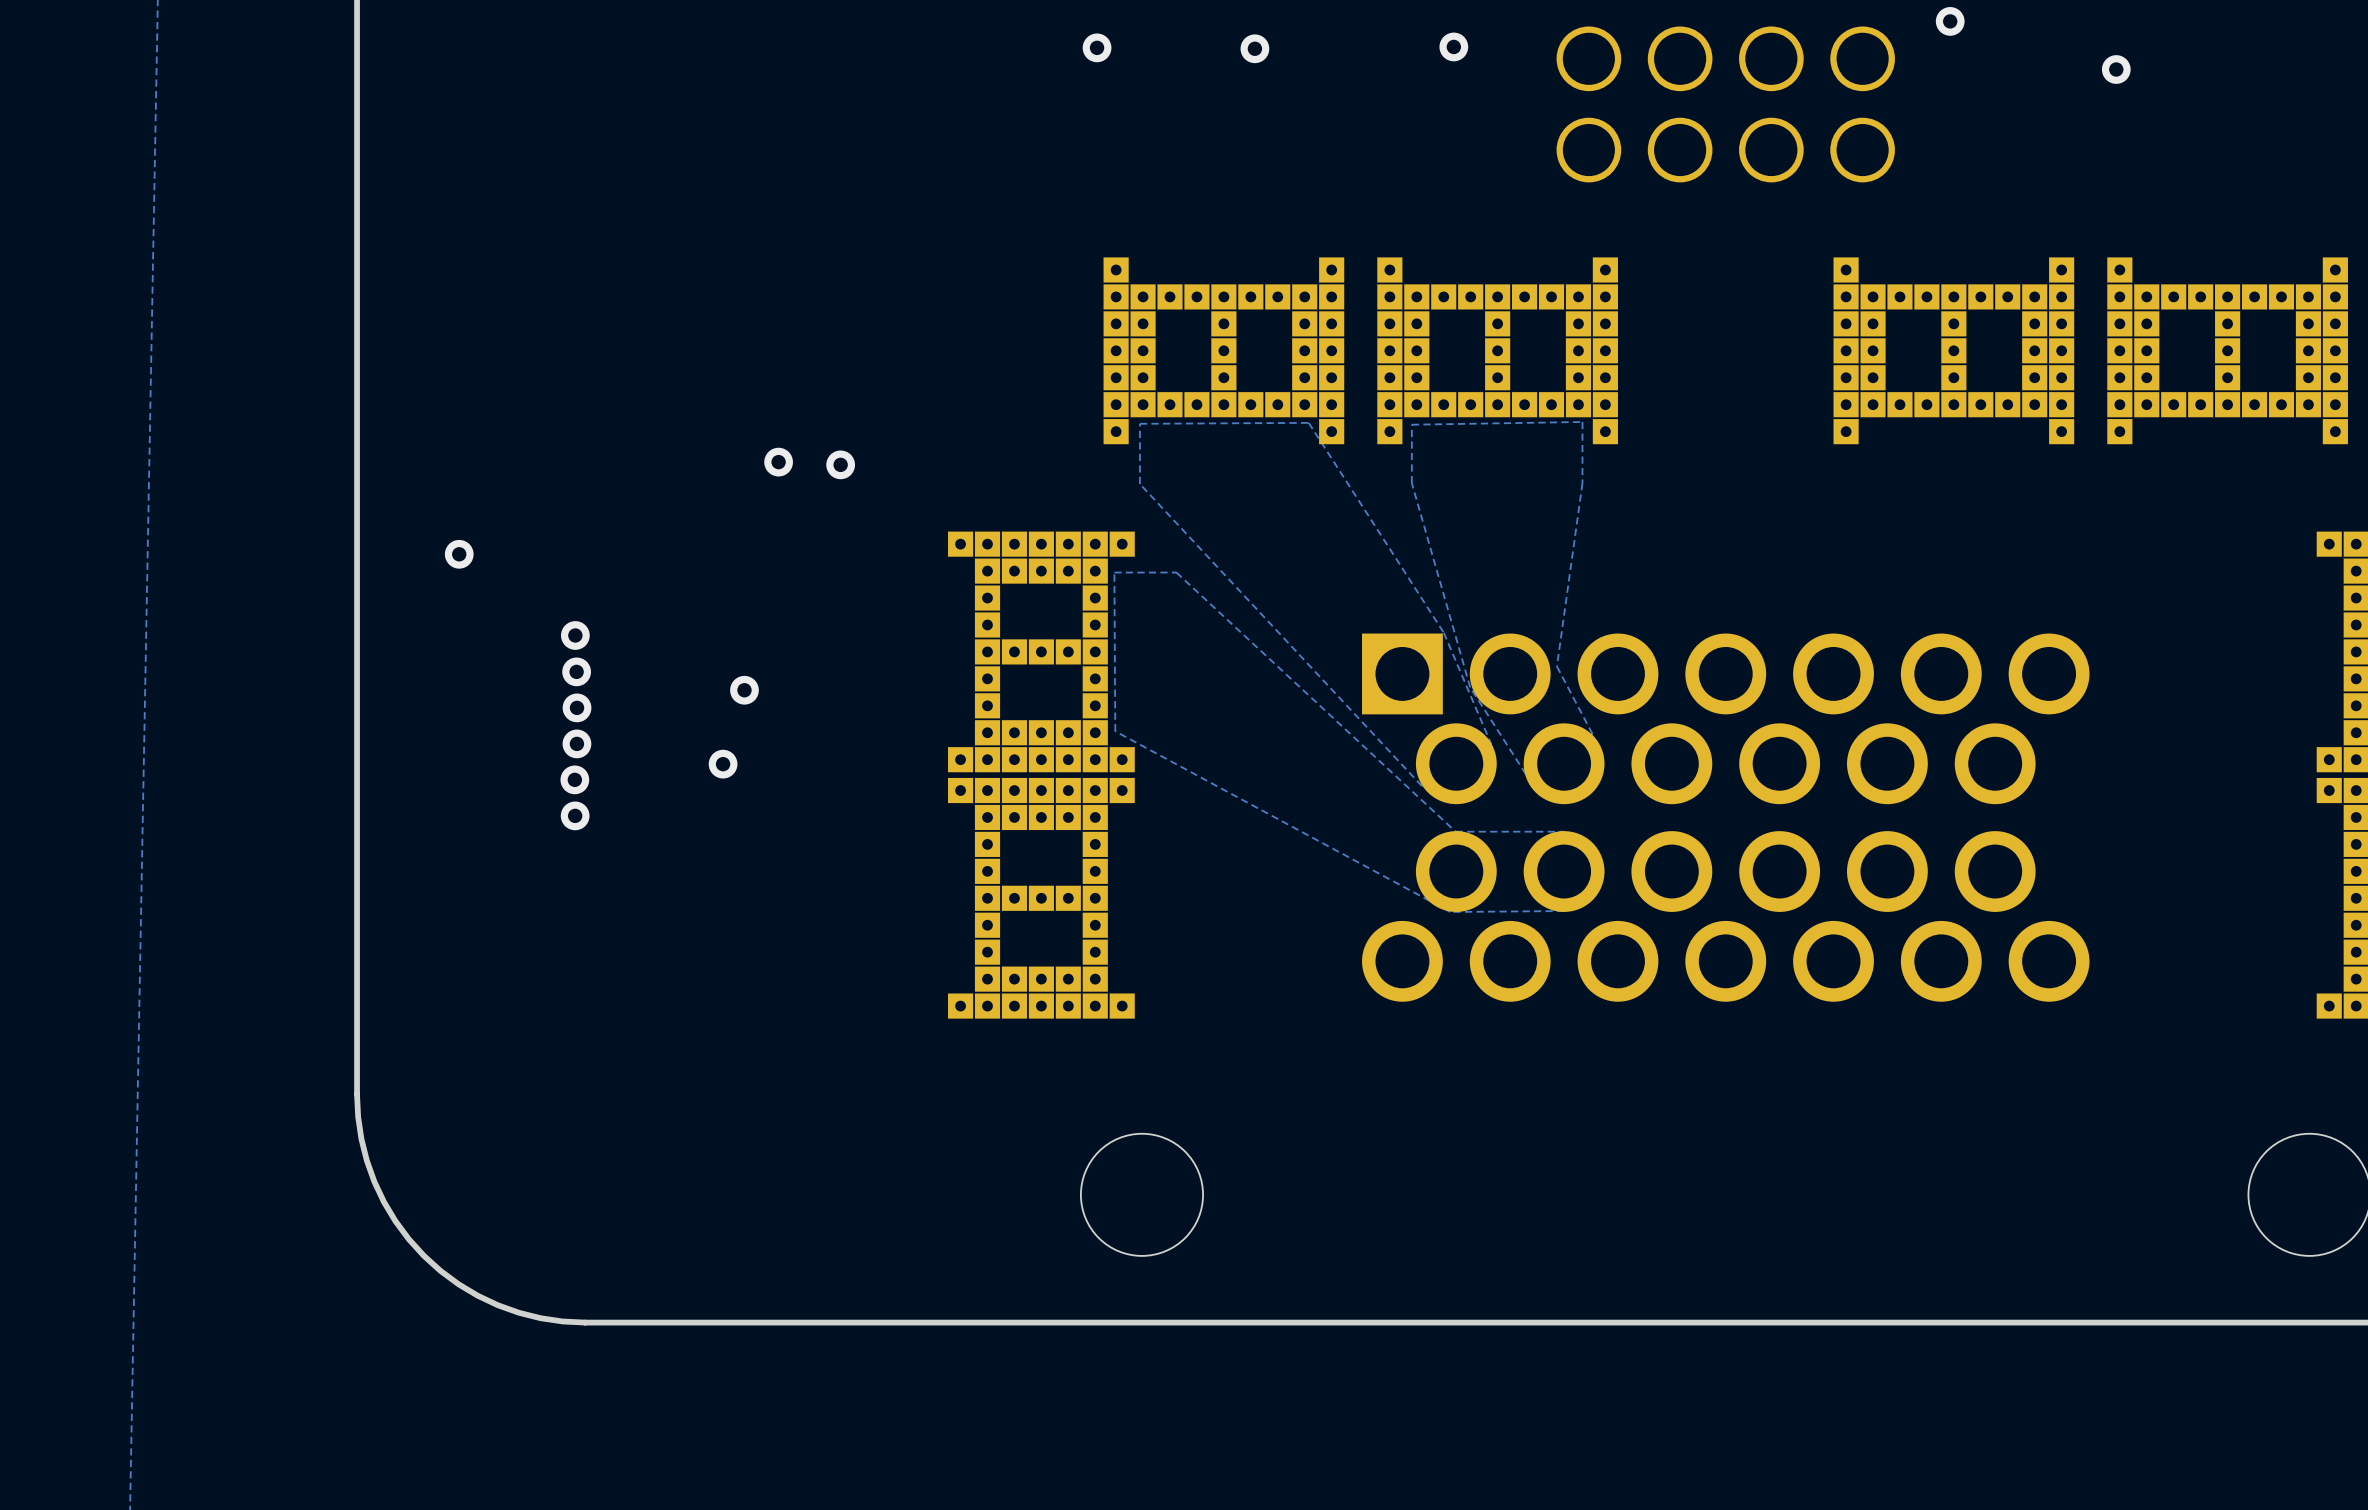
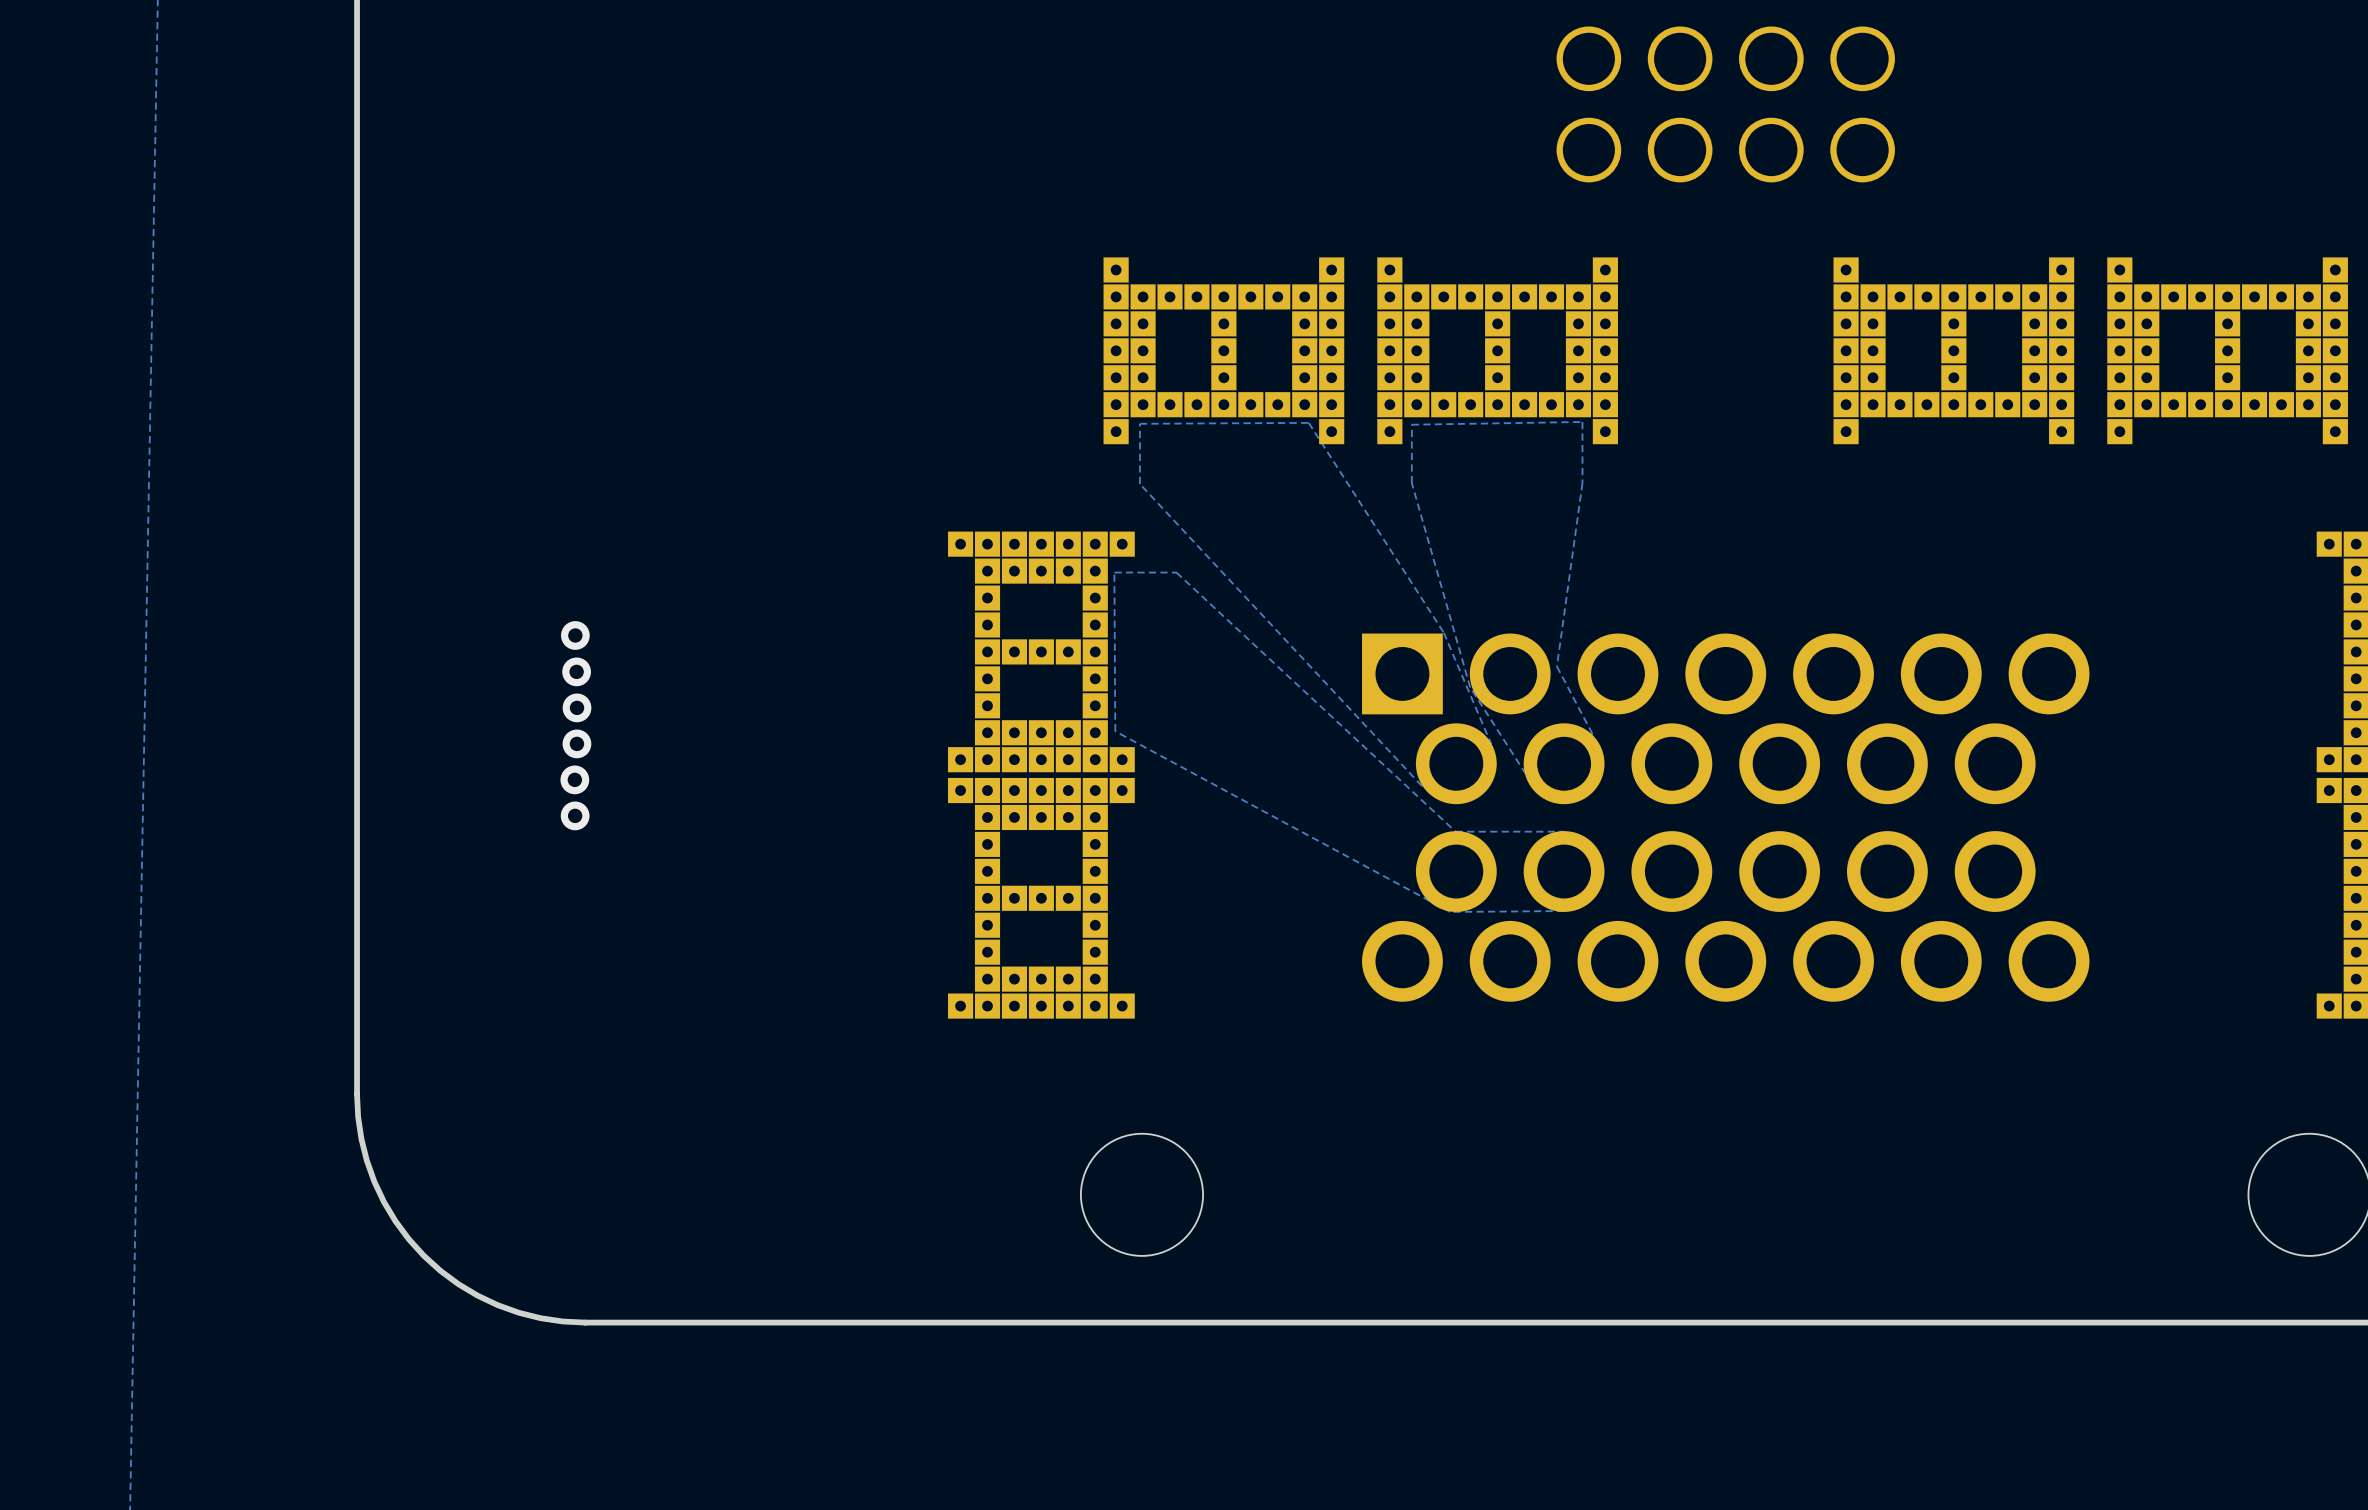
via: (1950, 21) -> none
via: (1453, 46) -> none
via: (1097, 47) -> none
via: (1254, 48) -> none
via: (2116, 69) -> none
via: (778, 462) -> none
via: (840, 464) -> none
via: (459, 554) -> none
via: (744, 690) -> none
via: (723, 764) -> none

